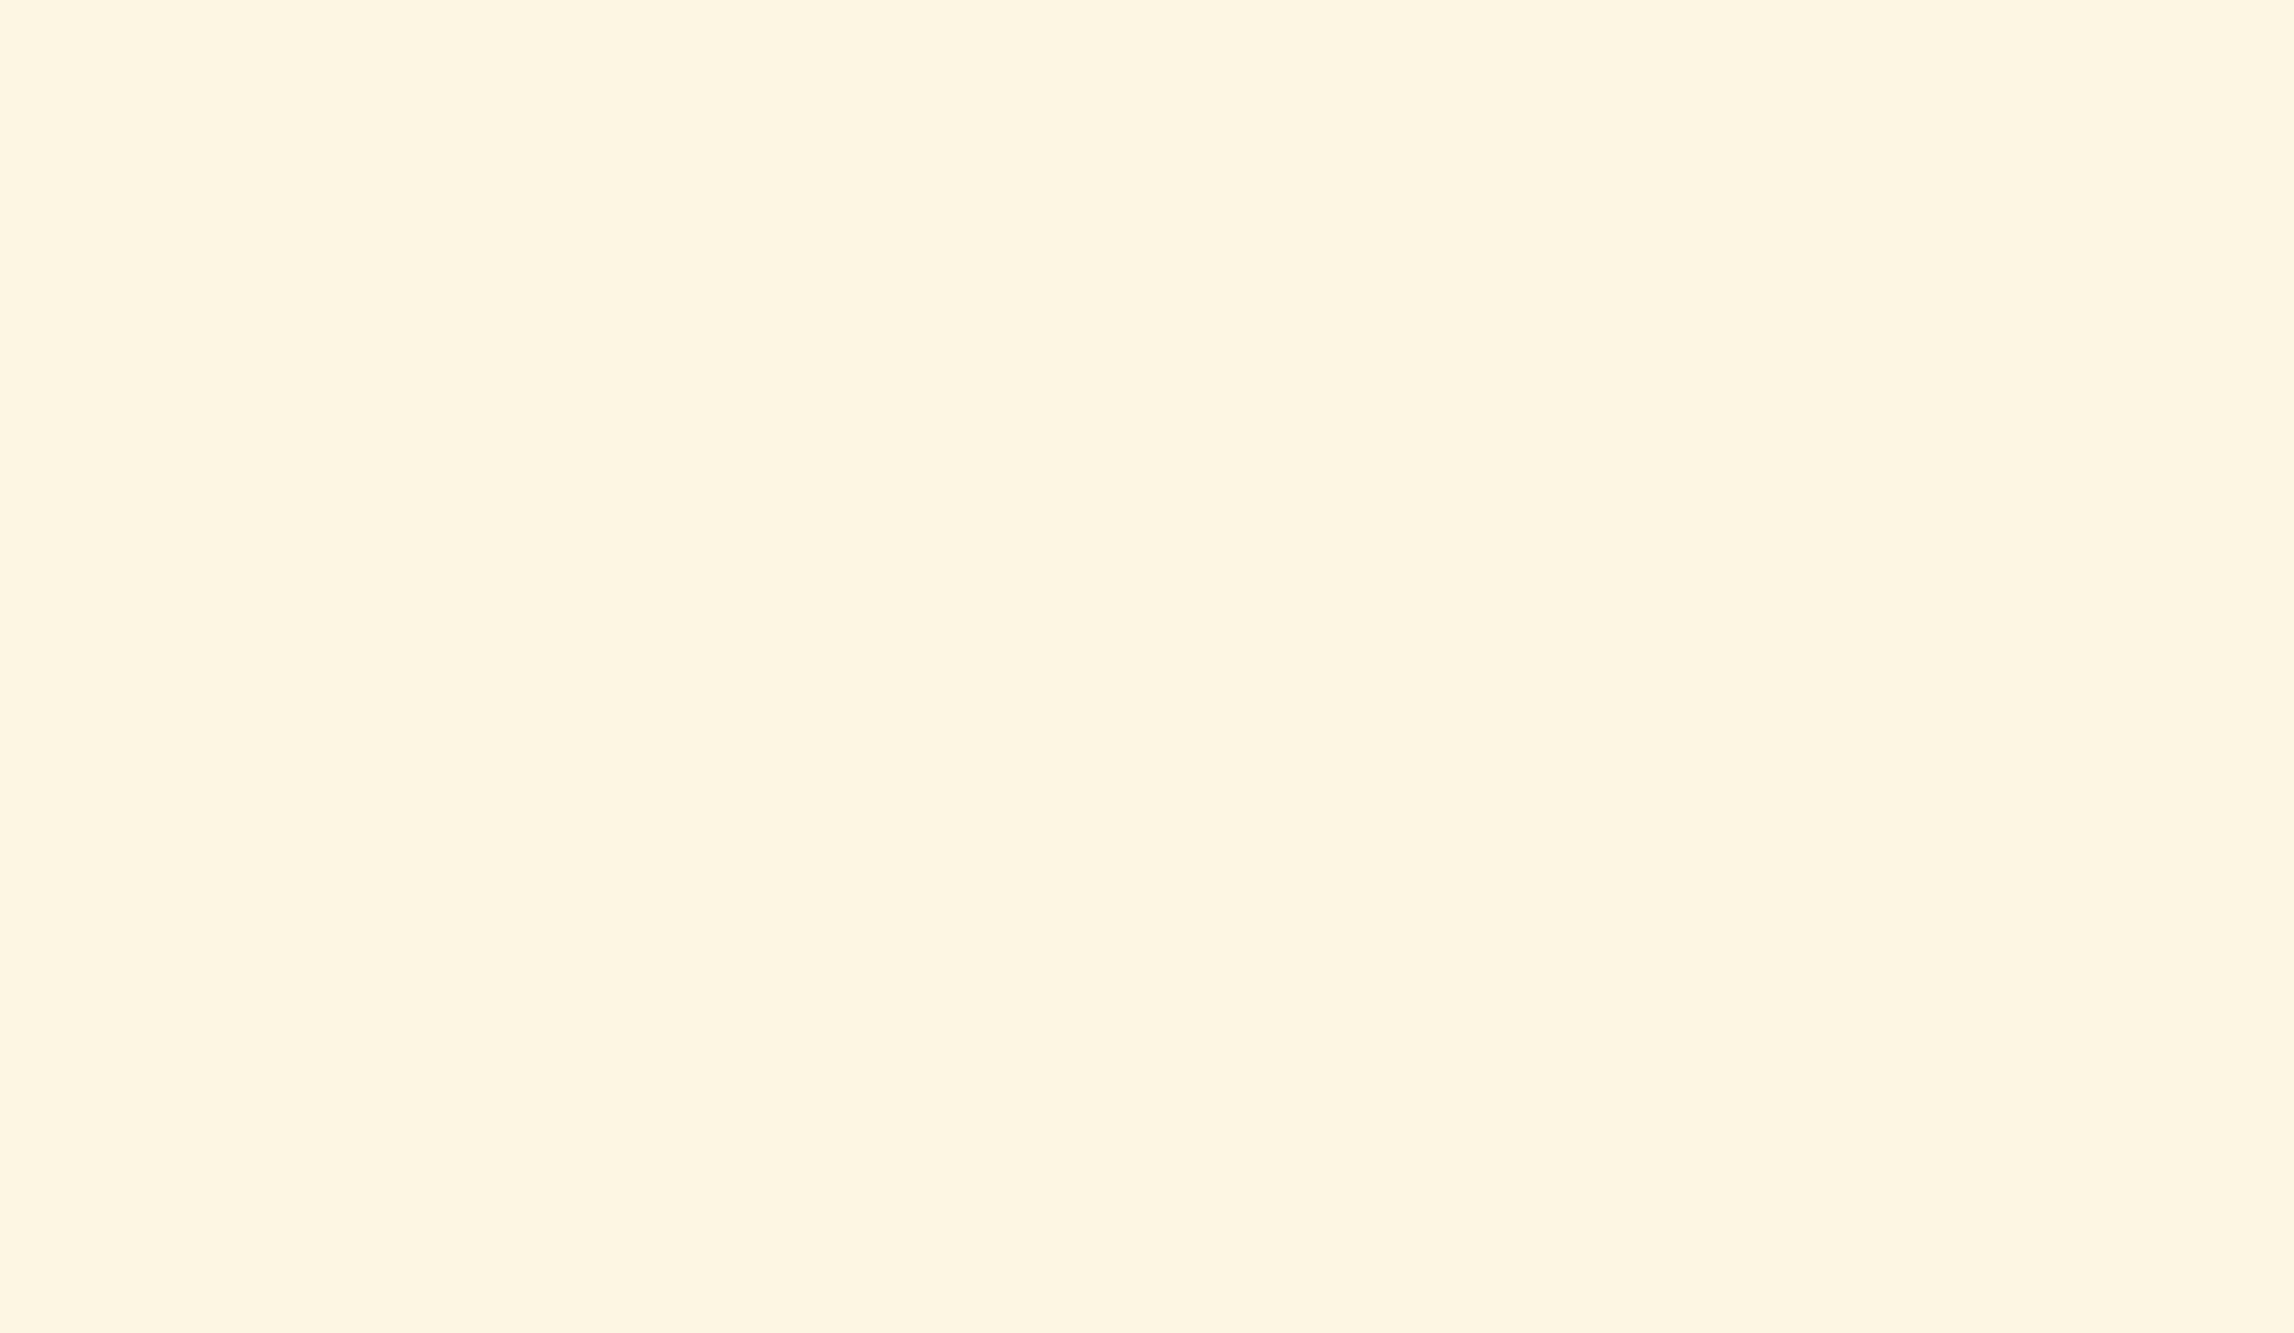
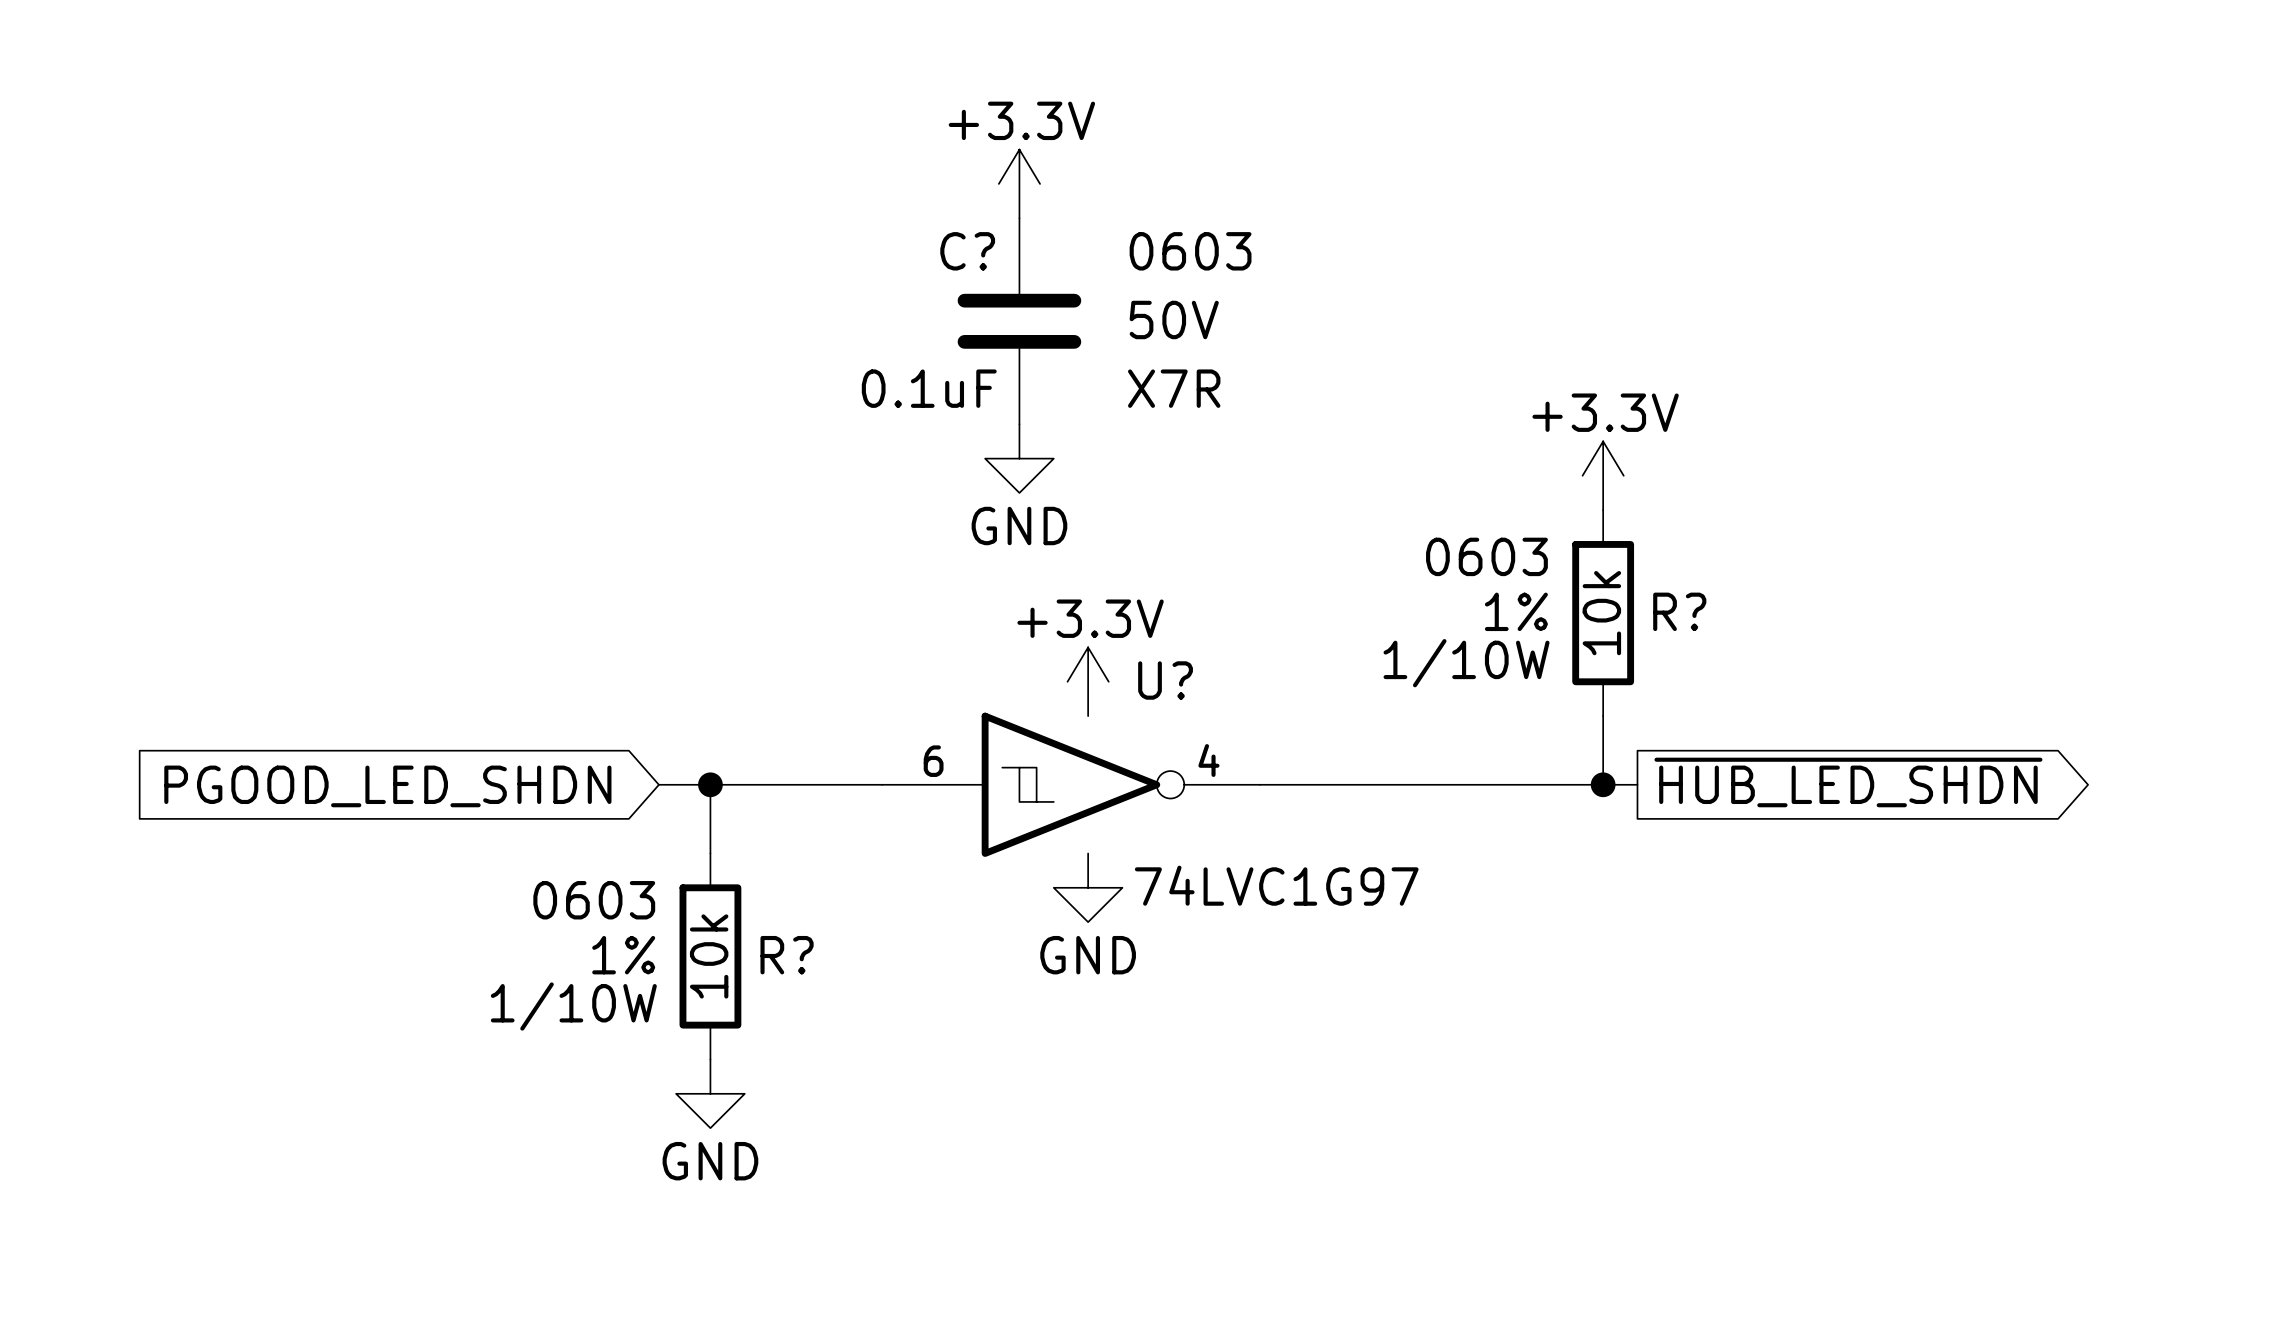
power symbol: none -> +3.3V (1019, 183)
C?: none -> 0.1uF (1019, 321)
power symbol: none -> GND (1019, 458)
power symbol: none -> +3.3V (1603, 475)
R?: none -> 10k (1603, 613)
power symbol: none -> +3.3V (1088, 681)
wire: none -> (1603, 716) (1603, 784)
global label: none -> ~{HUB_LED_SHDN} (1848, 782)
wire: none -> (658, 784) (882, 784)
wire: none -> (710, 784) (710, 853)
junction: none -> (710, 784)
U?: none -> 74LVC1G97 (1070, 784)
wire: none -> (1259, 784) (1637, 784)
junction: none -> (1603, 784)
global label: none -> PGOOD_LED_SHDN (387, 786)
power symbol: none -> GND (1088, 887)
R?: none -> 10k (710, 956)
power symbol: none -> GND (710, 1093)

